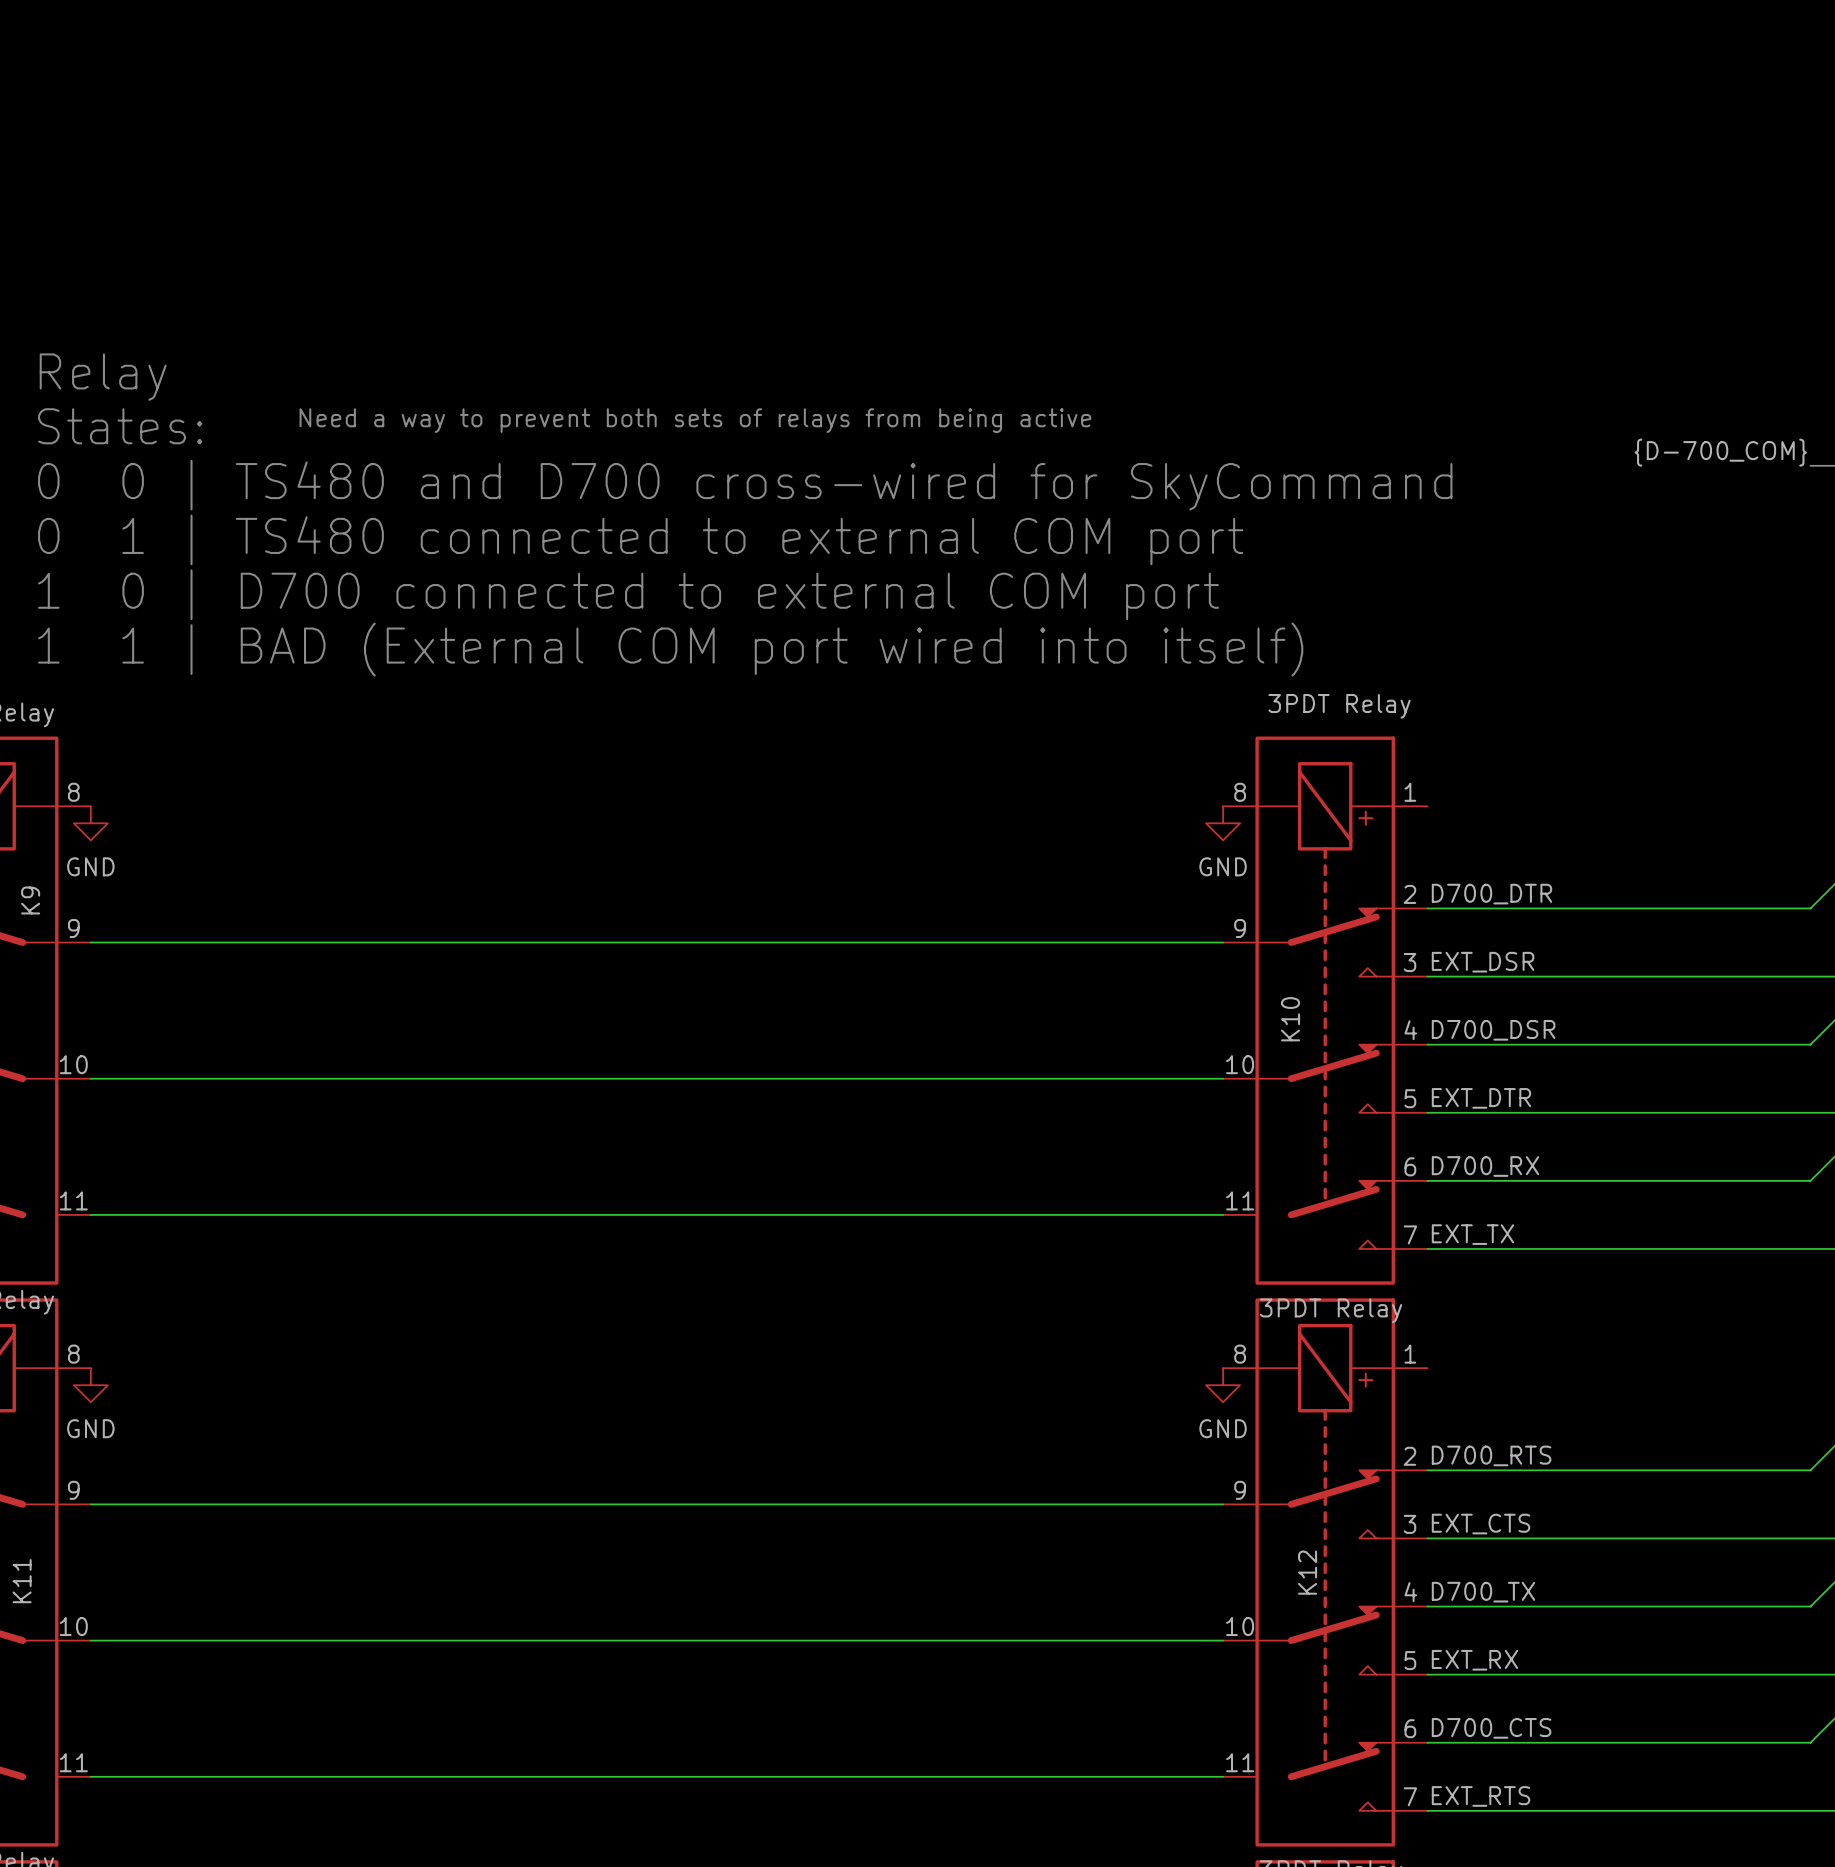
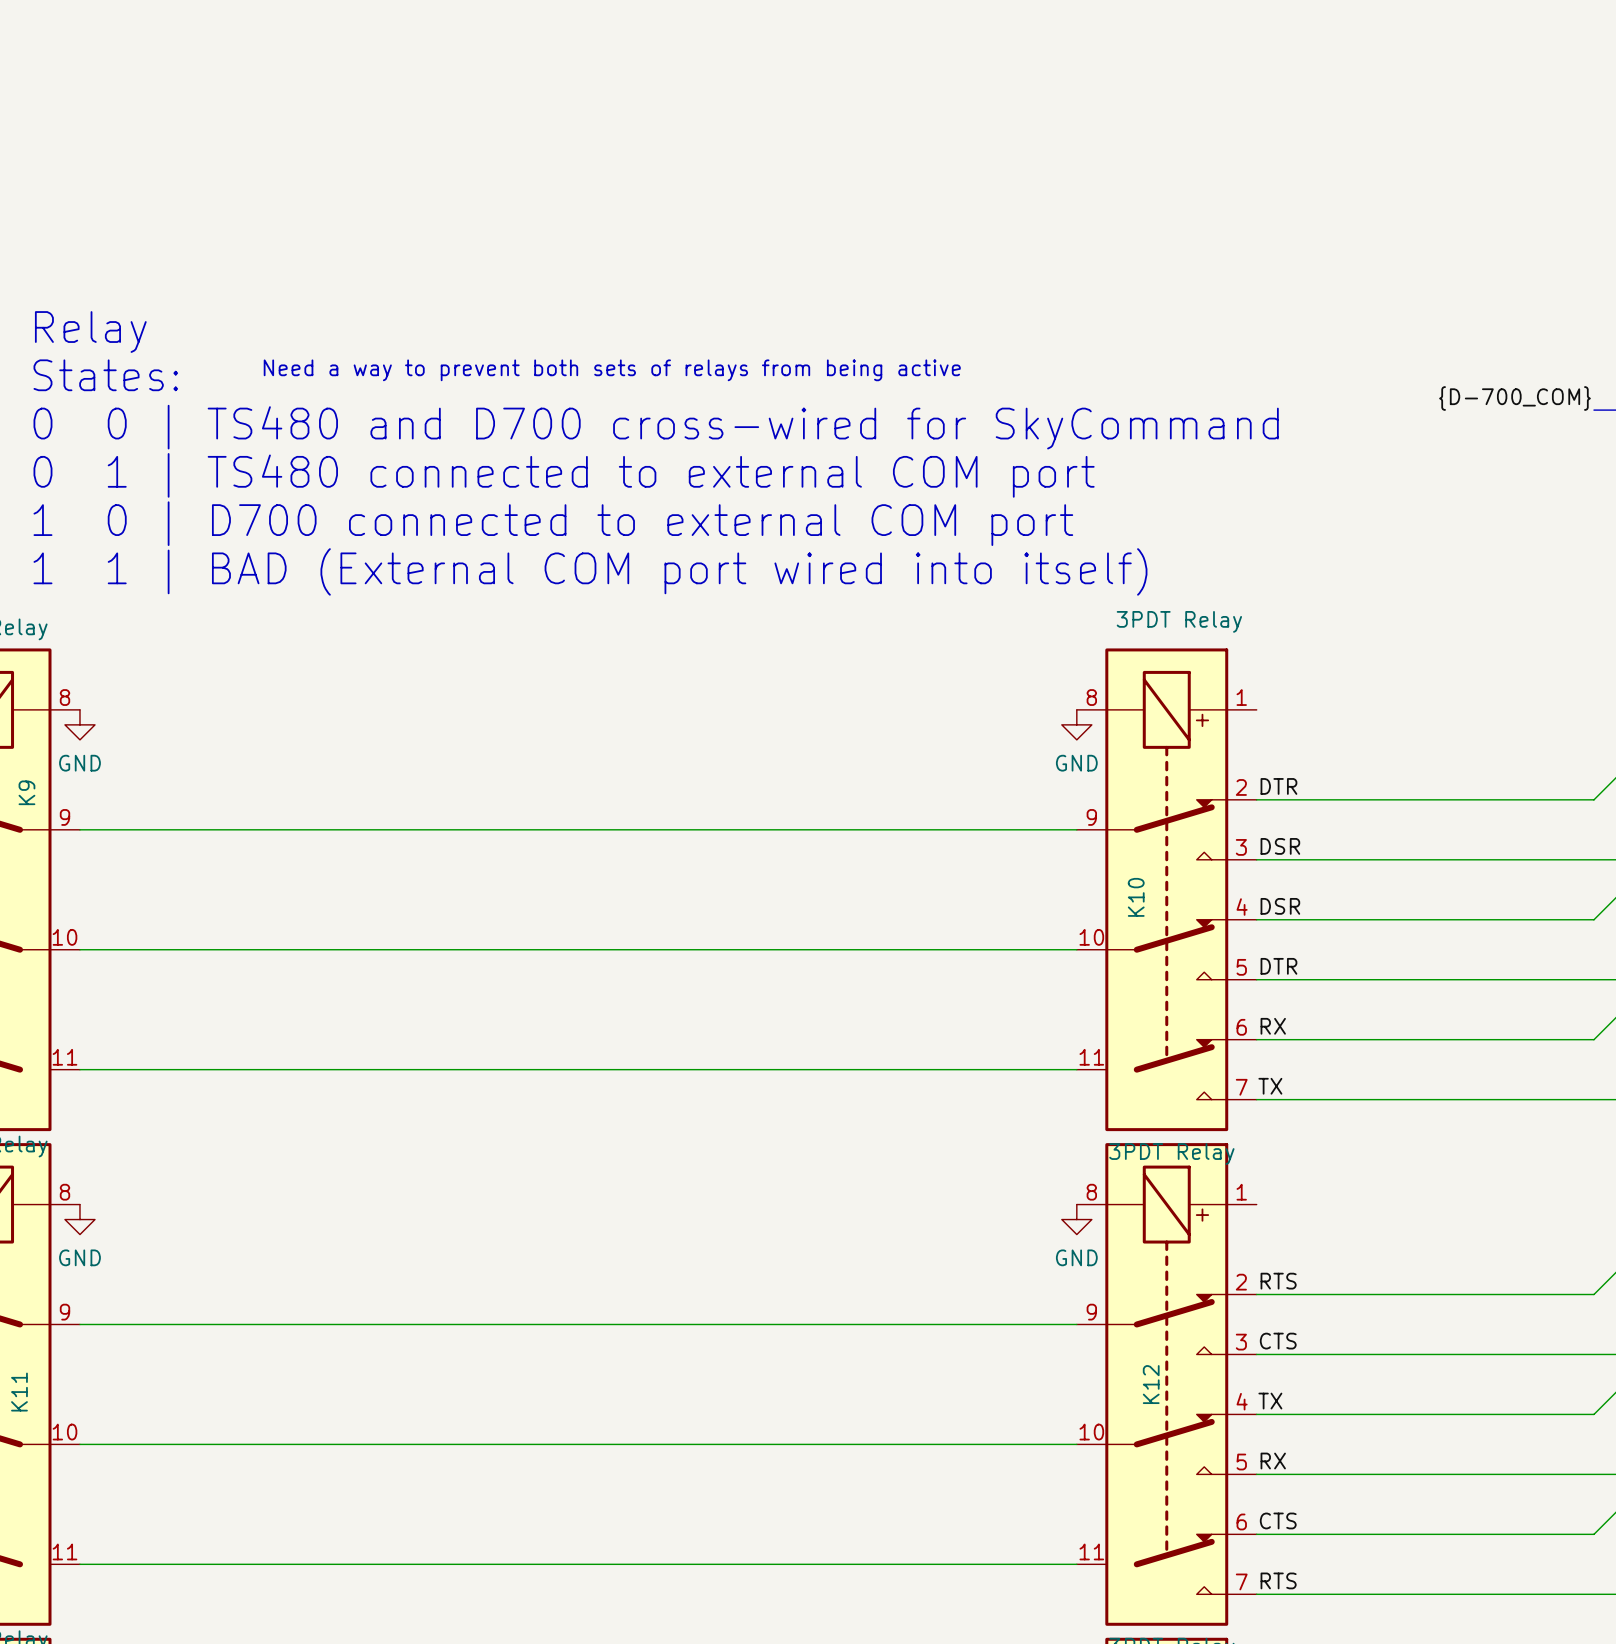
label: D700_DTR (1491, 894) -> DTR (1278, 786)
label: EXT_DSR (1483, 962) -> DSR (1280, 846)
label: D700_DSR (1493, 1030) -> DSR (1280, 906)
label: EXT_DTR (1481, 1098) -> DTR (1278, 966)
label: D700_RX (1485, 1166) -> RX (1273, 1026)
label: EXT_TX (1472, 1234) -> TX (1270, 1086)
label: D700_RTS (1491, 1455) -> RTS (1278, 1281)
label: EXT_CTS (1481, 1524) -> CTS (1278, 1341)
label: D700_TX (1483, 1592) -> TX (1270, 1401)
label: EXT_RX (1474, 1660) -> RX (1273, 1461)
label: D700_CTS (1491, 1728) -> CTS (1278, 1520)
label: EXT_RTS (1481, 1796) -> RTS (1278, 1580)

